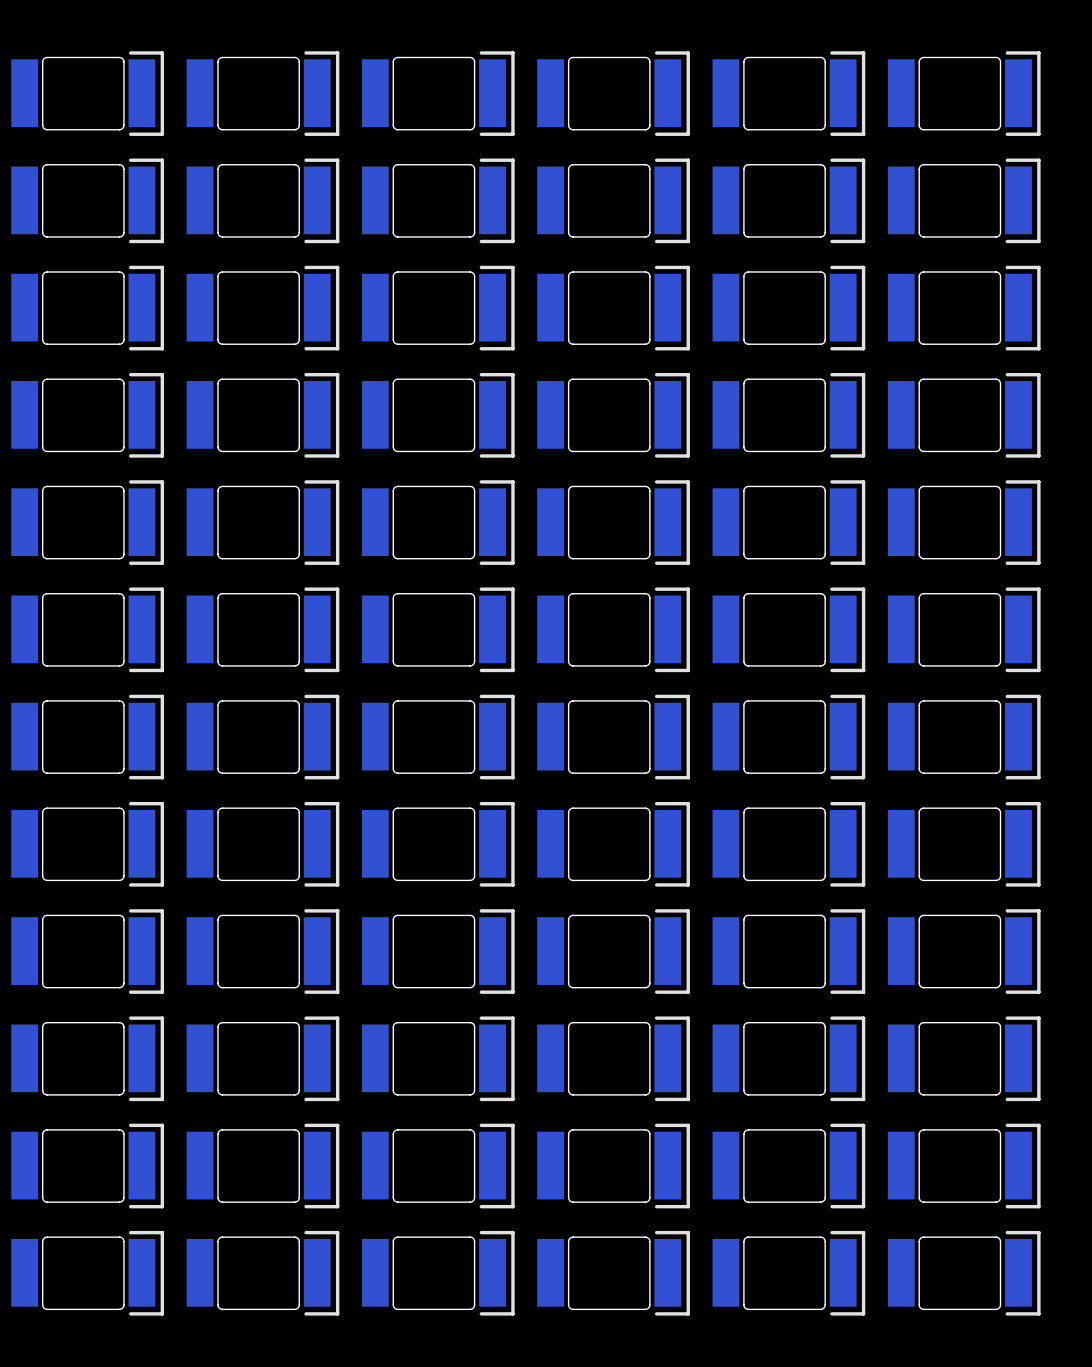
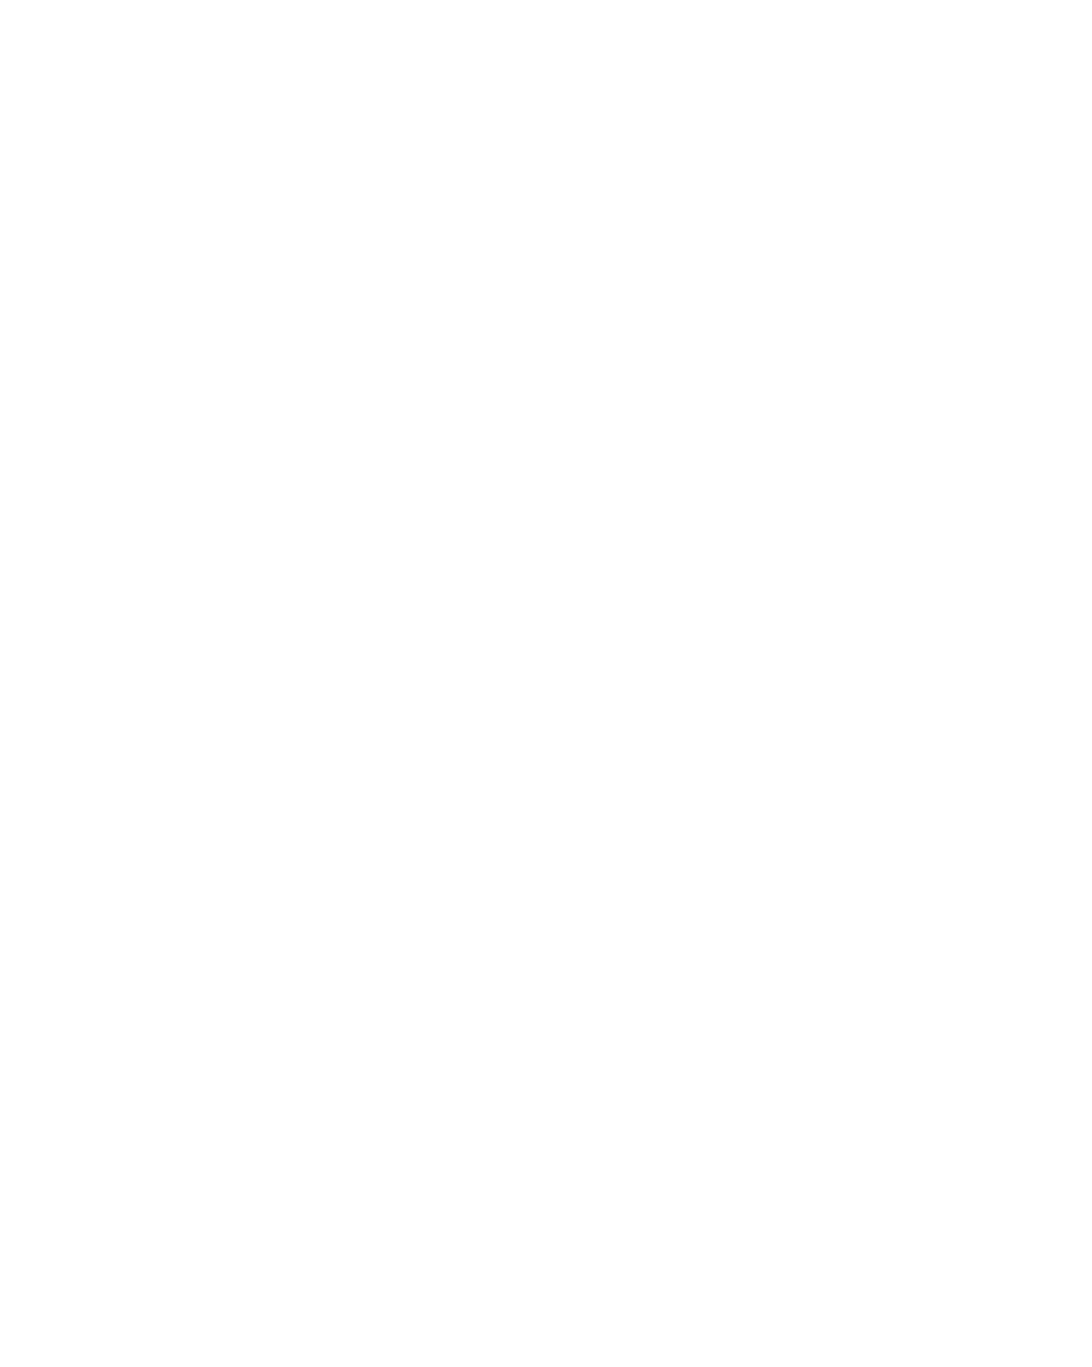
part: (87, 93) -> none
part: (262, 93) -> none
part: (438, 93) -> none
part: (613, 93) -> none
part: (788, 93) -> none
part: (964, 93) -> none
part: (87, 200) -> none
part: (262, 200) -> none
part: (438, 200) -> none
part: (613, 200) -> none
part: (788, 200) -> none
part: (964, 200) -> none
part: (87, 308) -> none
part: (262, 308) -> none
part: (438, 308) -> none
part: (613, 308) -> none
part: (788, 308) -> none
part: (964, 308) -> none
part: (87, 415) -> none
part: (262, 415) -> none
part: (438, 415) -> none
part: (613, 415) -> none
part: (788, 415) -> none
part: (964, 415) -> none
part: (87, 522) -> none
part: (262, 522) -> none
part: (438, 522) -> none
part: (613, 522) -> none
part: (788, 522) -> none
part: (964, 522) -> none
part: (87, 629) -> none
part: (262, 629) -> none
part: (438, 629) -> none
part: (613, 629) -> none
part: (788, 629) -> none
part: (964, 629) -> none
part: (87, 737) -> none
part: (262, 737) -> none
part: (438, 737) -> none
part: (613, 737) -> none
part: (788, 737) -> none
part: (964, 737) -> none
part: (87, 844) -> none
part: (262, 844) -> none
part: (438, 844) -> none
part: (613, 844) -> none
part: (788, 844) -> none
part: (964, 844) -> none
part: (87, 951) -> none
part: (262, 951) -> none
part: (438, 951) -> none
part: (613, 951) -> none
part: (788, 951) -> none
part: (964, 951) -> none
part: (87, 1058) -> none
part: (262, 1058) -> none
part: (438, 1058) -> none
part: (613, 1058) -> none
part: (788, 1058) -> none
part: (964, 1058) -> none
part: (87, 1166) -> none
part: (262, 1166) -> none
part: (438, 1166) -> none
part: (613, 1166) -> none
part: (788, 1166) -> none
part: (964, 1166) -> none
part: (87, 1273) -> none
part: (262, 1273) -> none
part: (438, 1273) -> none
part: (613, 1273) -> none
part: (788, 1273) -> none
part: (964, 1273) -> none

